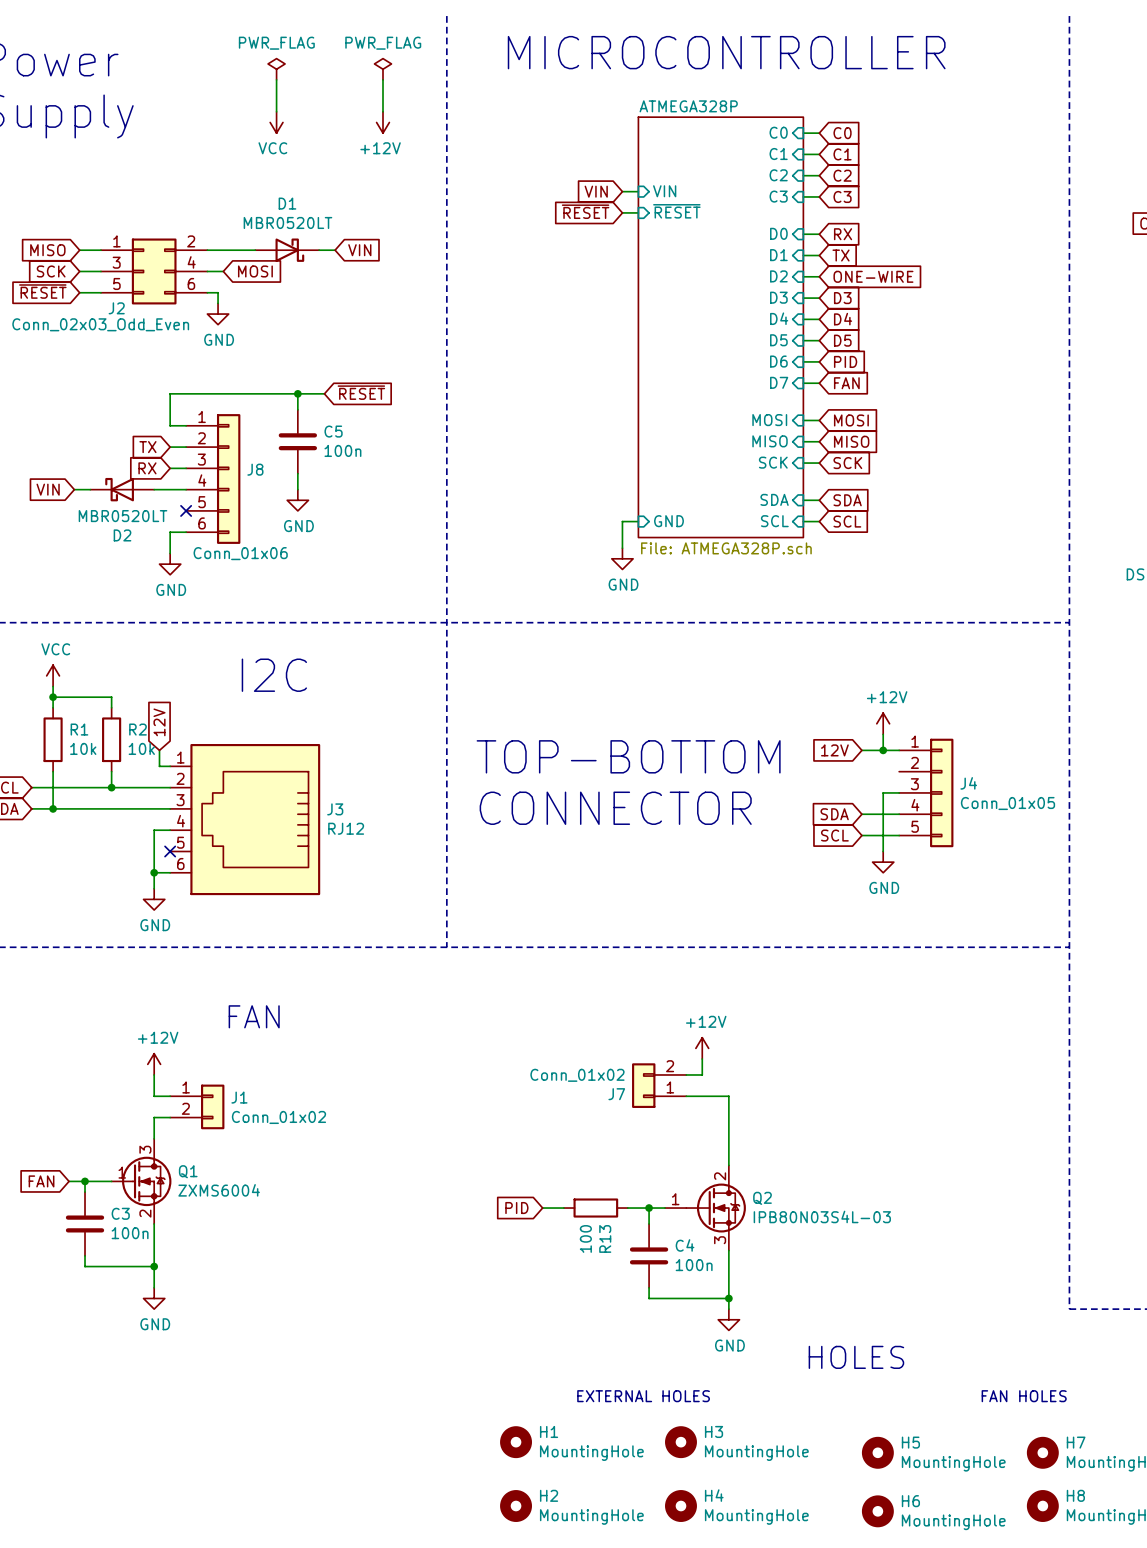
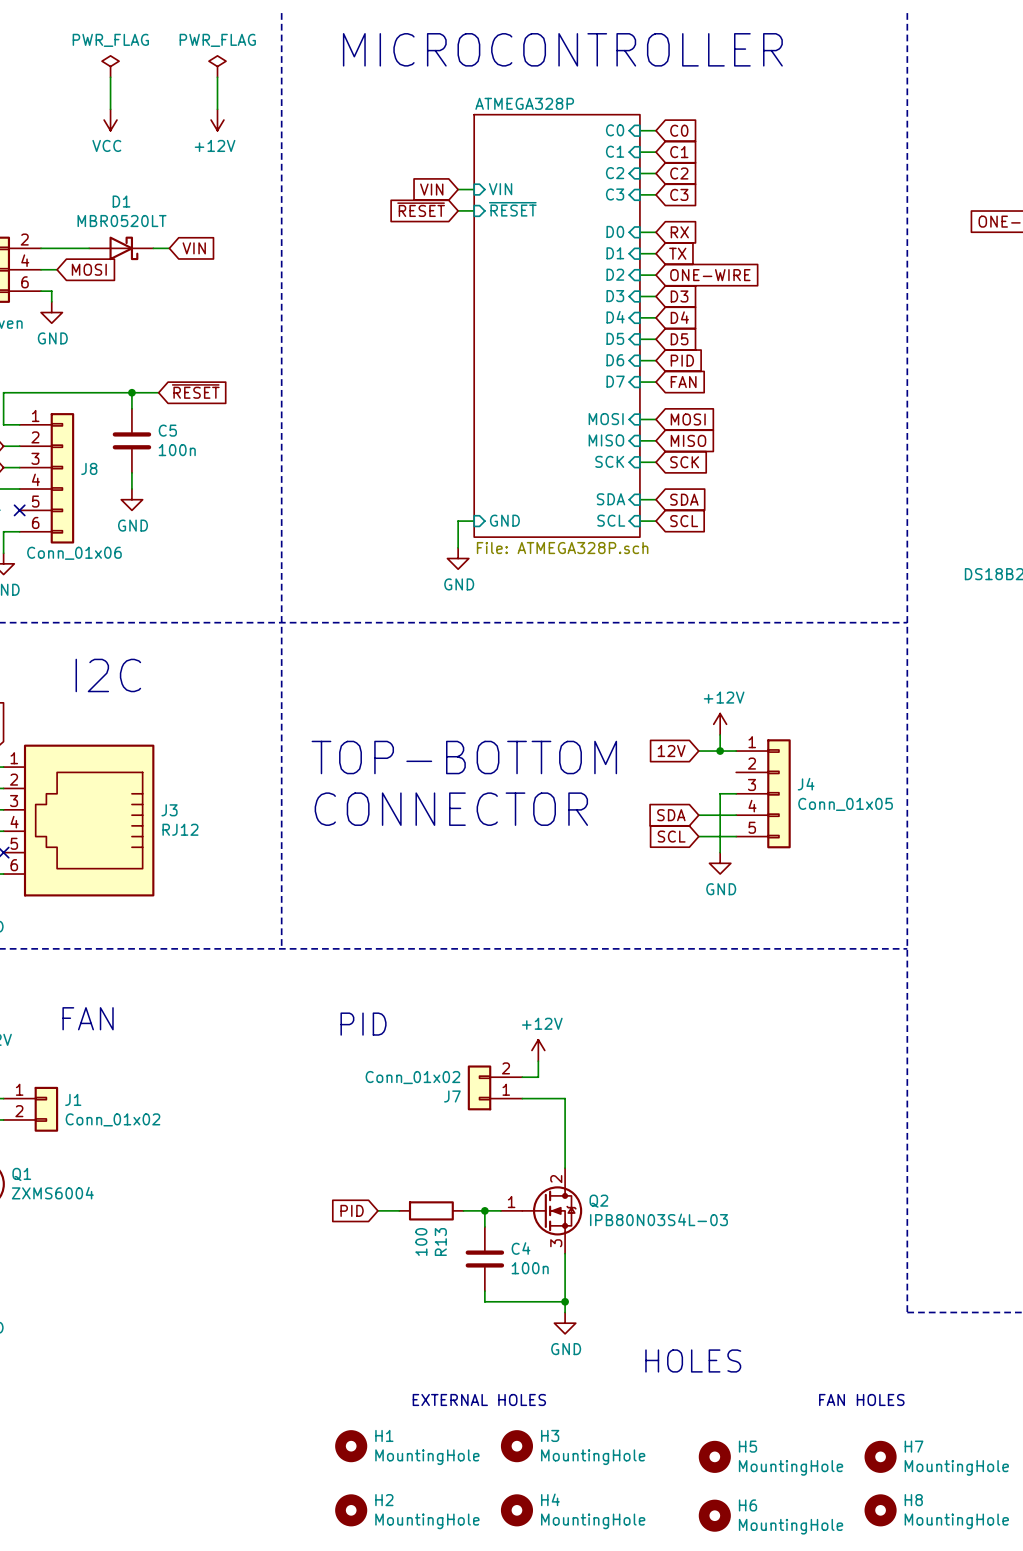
text: none -> PID (363, 1024)

